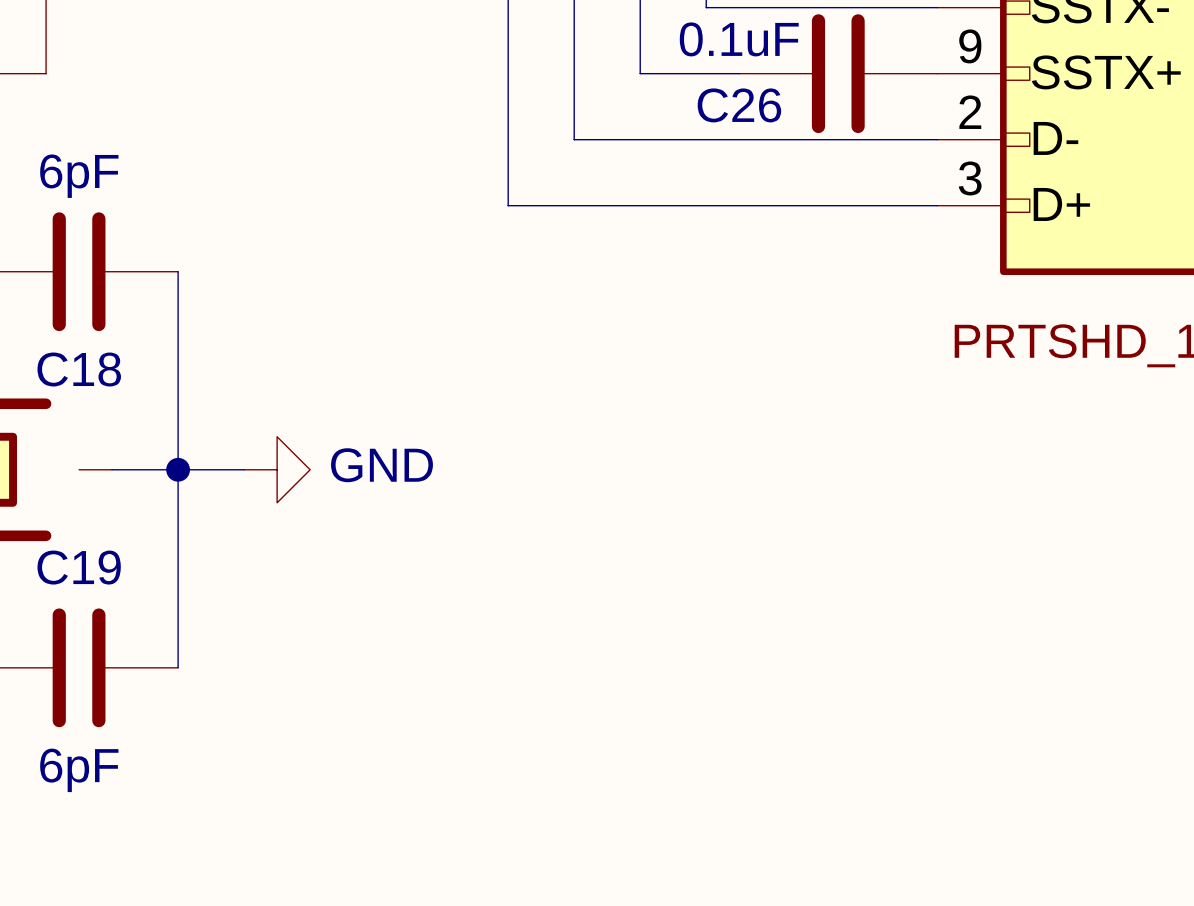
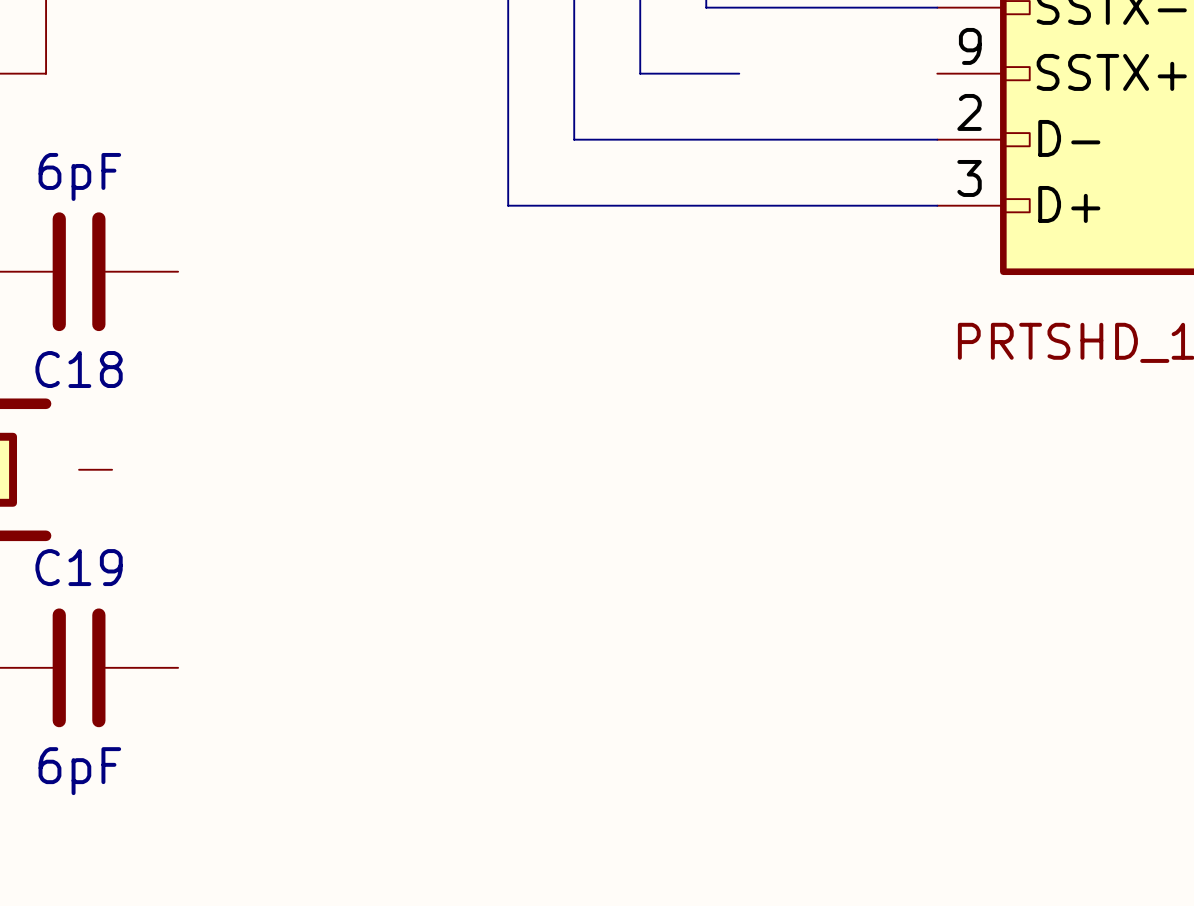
C26: 0.1uF (838, 73) -> none
wire: (178, 271) (178, 667) -> none
wire: (112, 469) (244, 469) -> none
junction: (178, 469) -> none
power symbol: GND (277, 469) -> none

